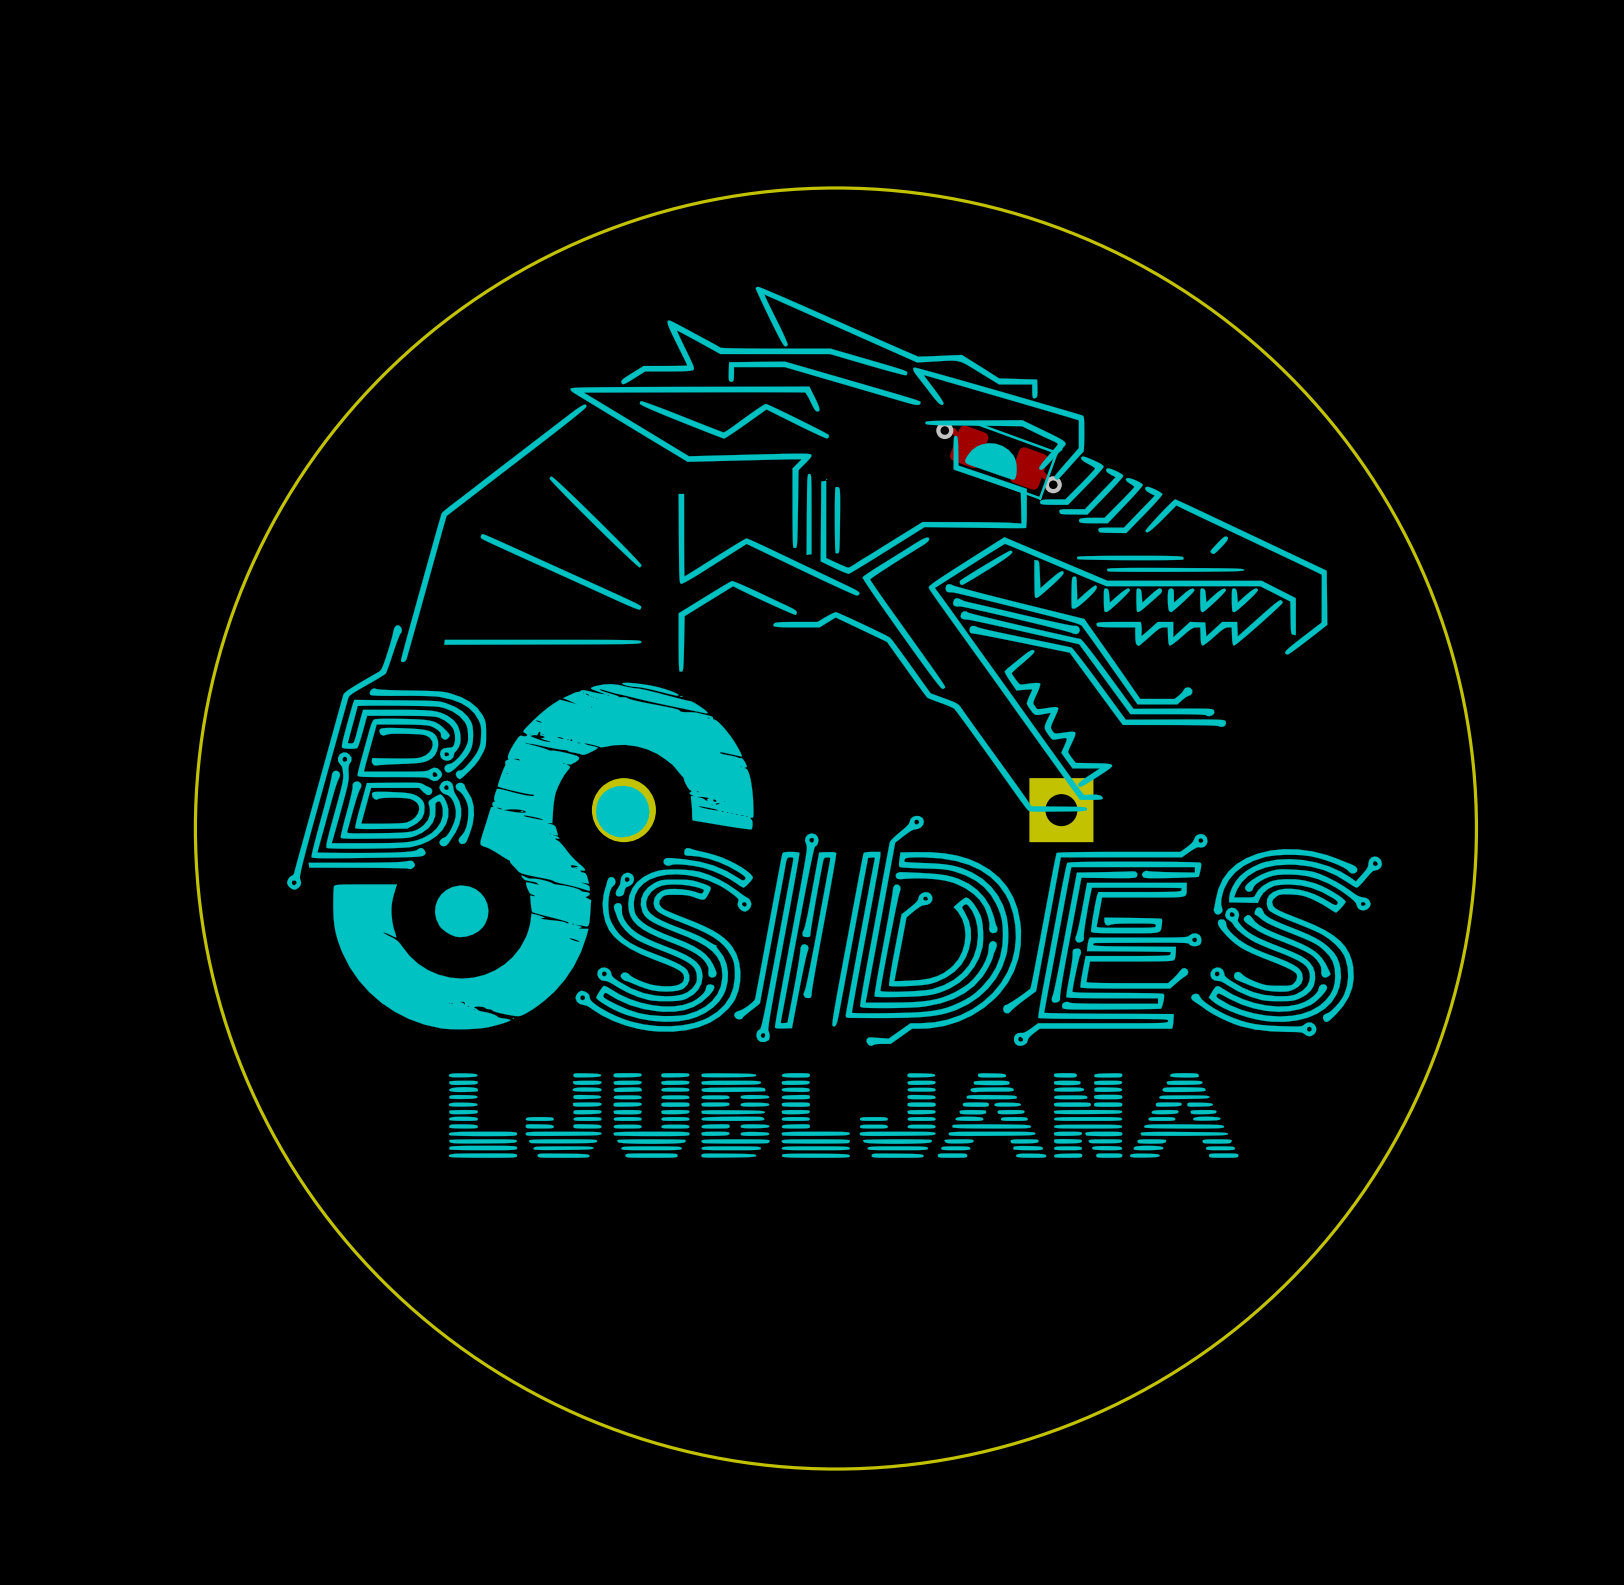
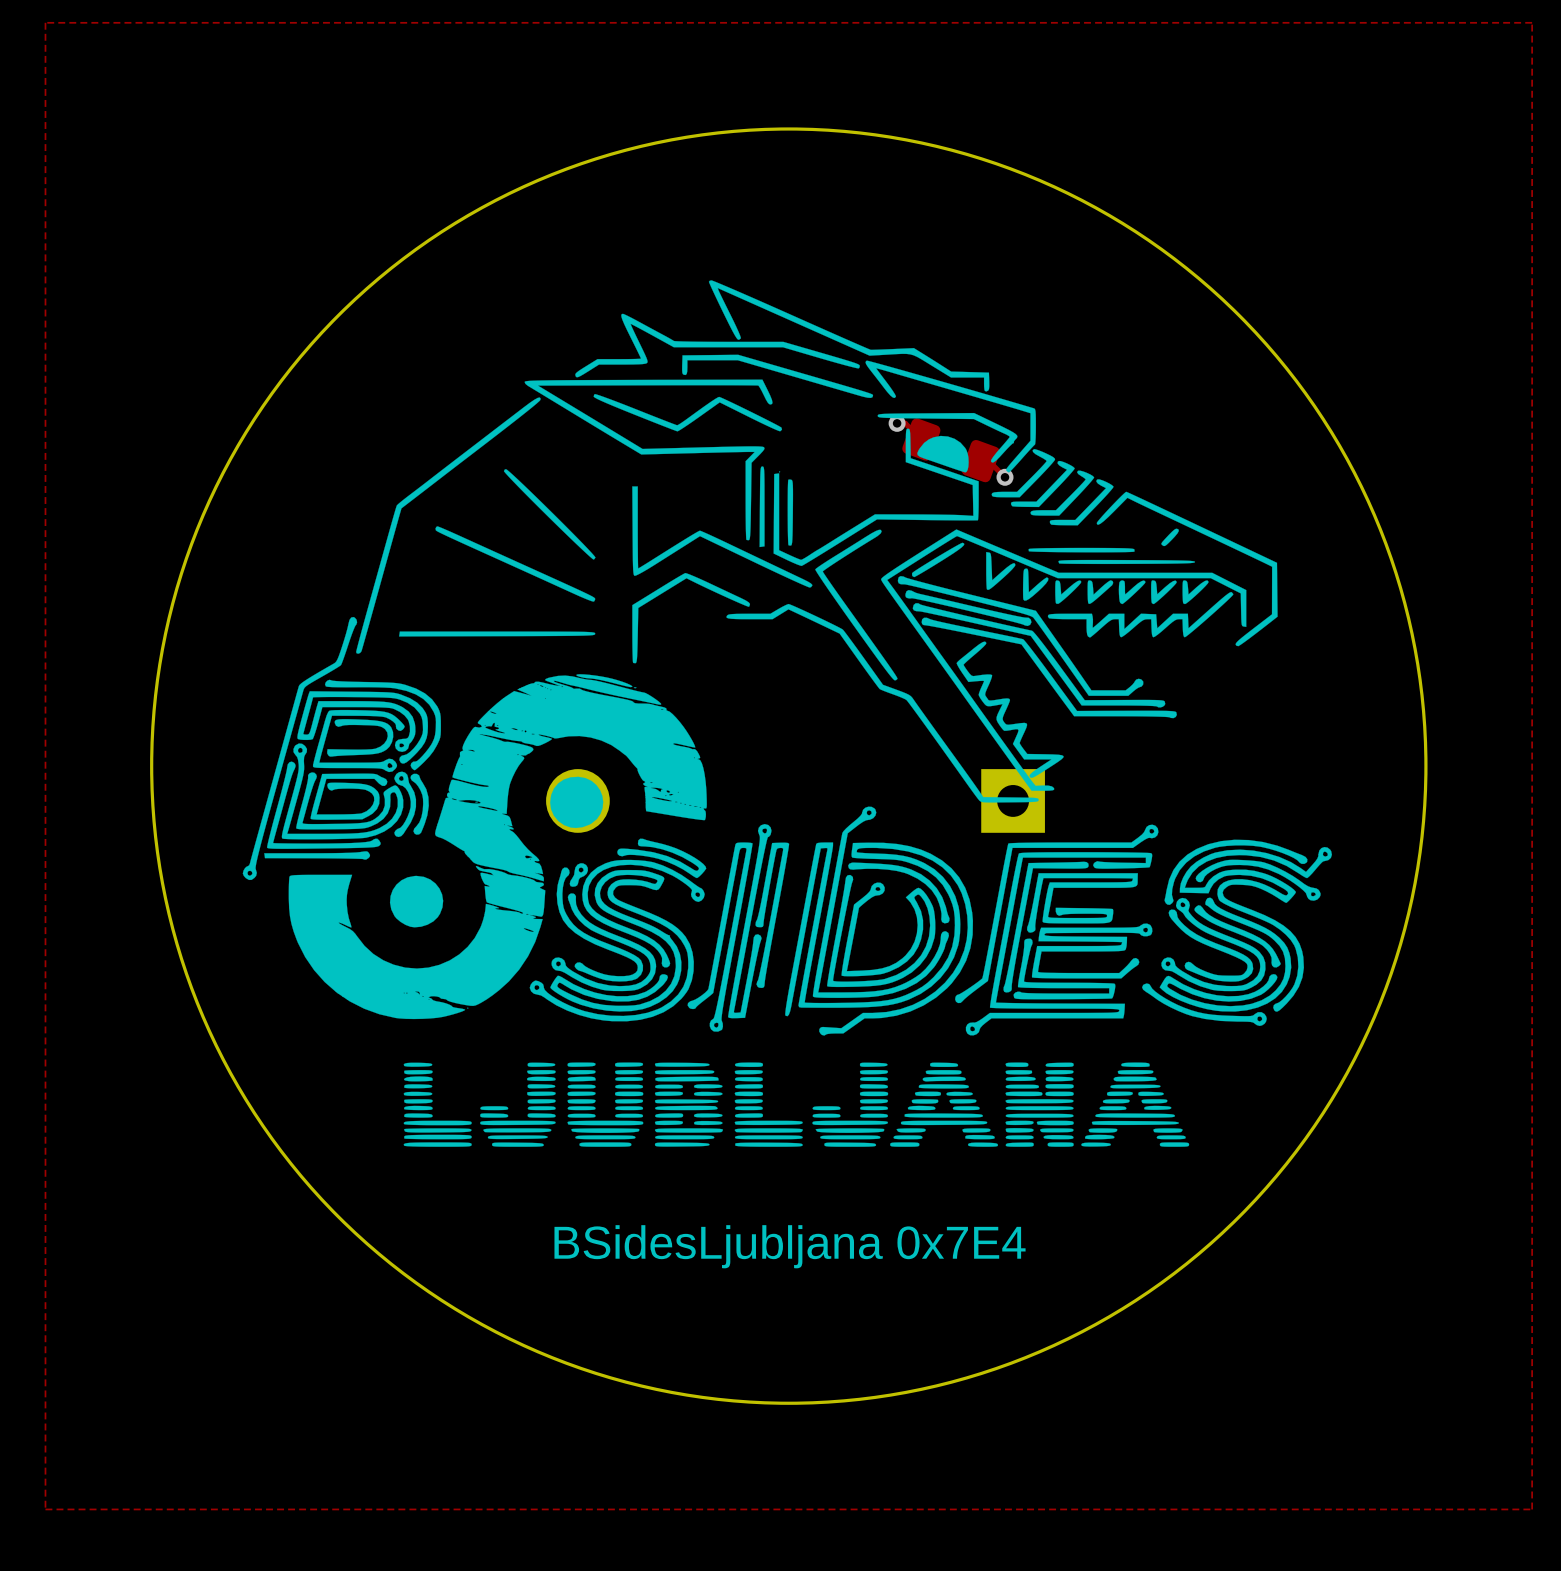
zone outline: none -> (45, 22) (45, 1509) (1532, 1509) (1532, 22) (45, 22)
part footprint: [950, 421, 1058, 500] -> [902, 418, 1000, 483]
round board edge position: (835, 828) -> (788, 766)
text: none -> BSidesLjubljana 0x7E4 (790, 1246)

